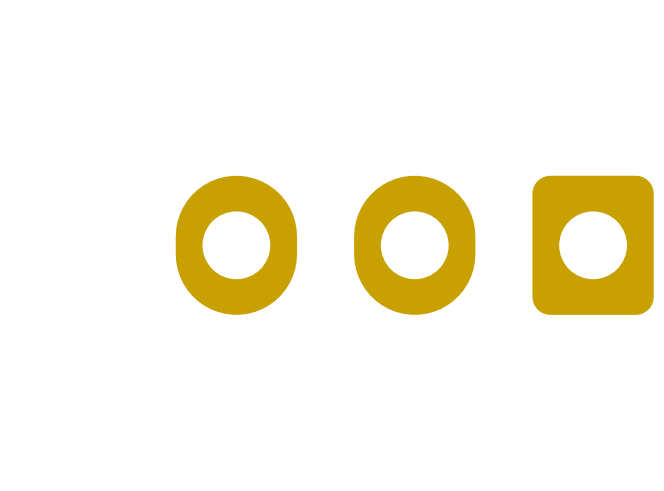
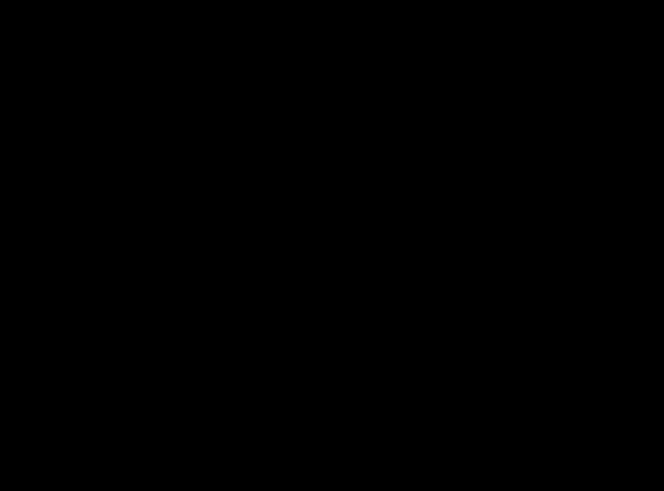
part: (414, 245) -> none

